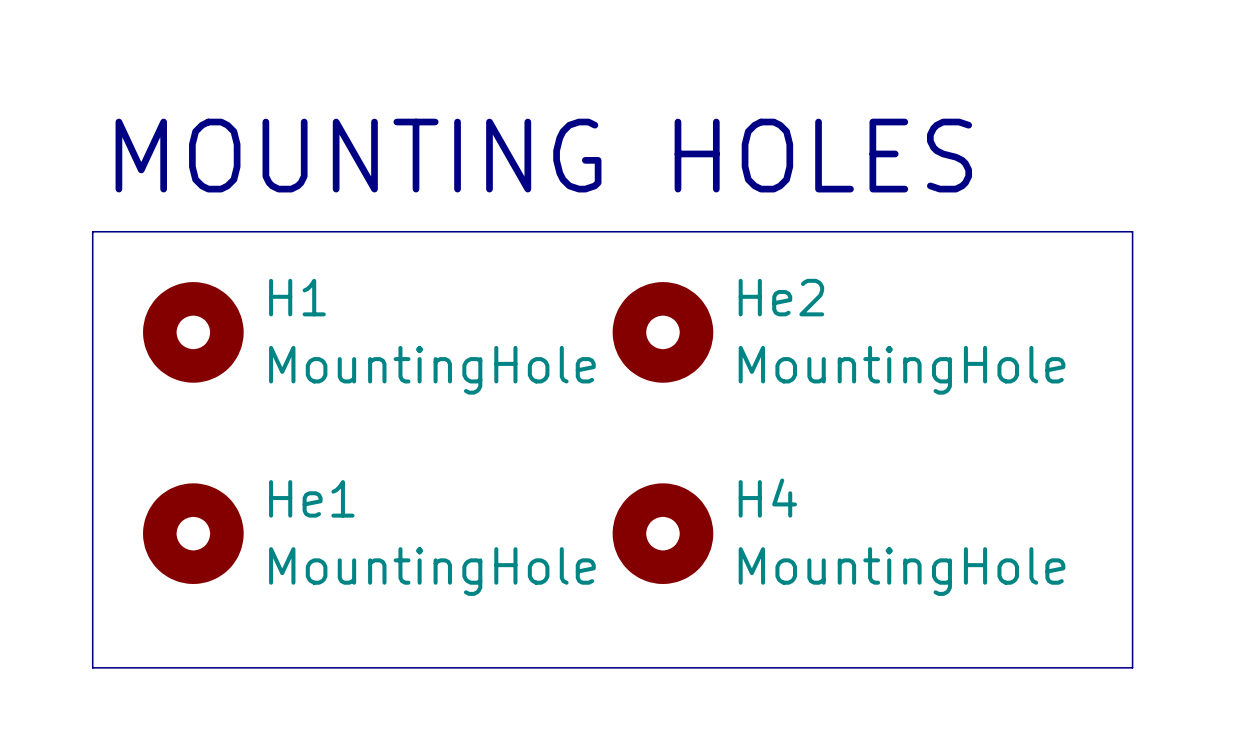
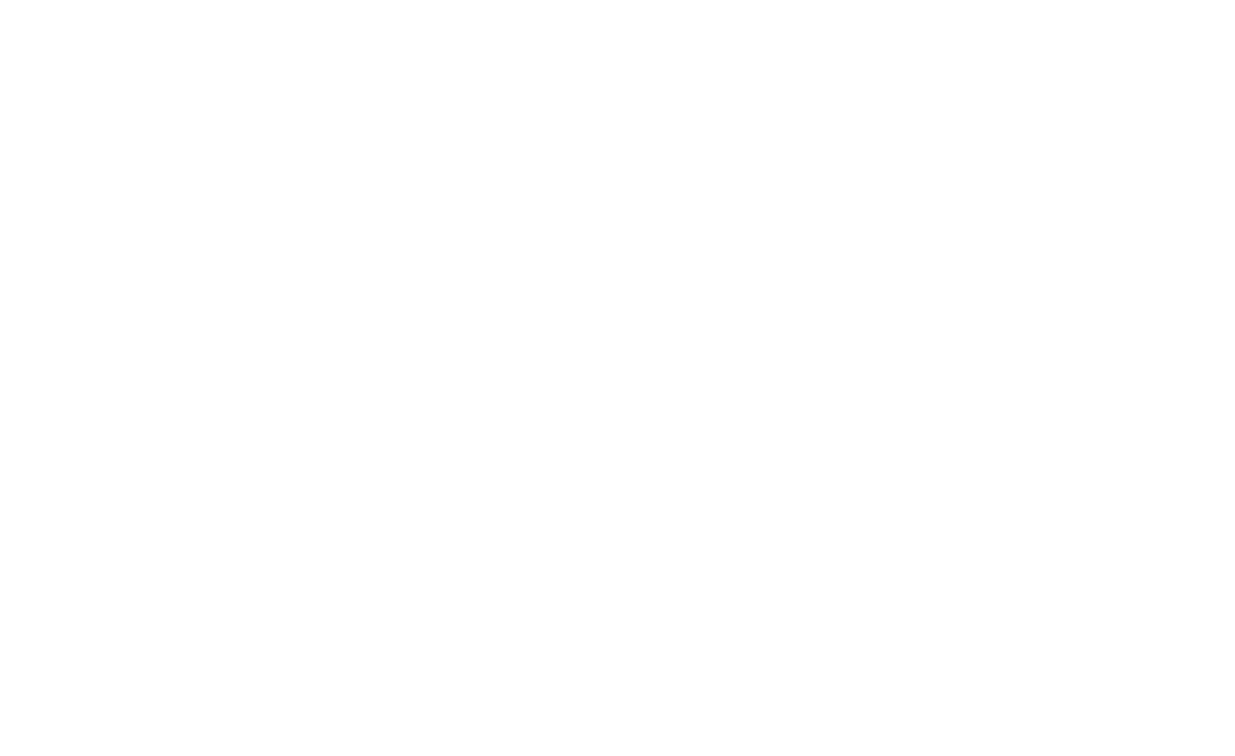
text: MOUNTING HOLES (543, 155) -> none
line: (92, 231) (1132, 231) (1132, 667) (92, 667) (92, 231) -> none
H1: MountingHole (193, 332) -> none
He2: MountingHole (662, 332) -> none
He1: MountingHole (193, 533) -> none
H4: MountingHole (662, 533) -> none

